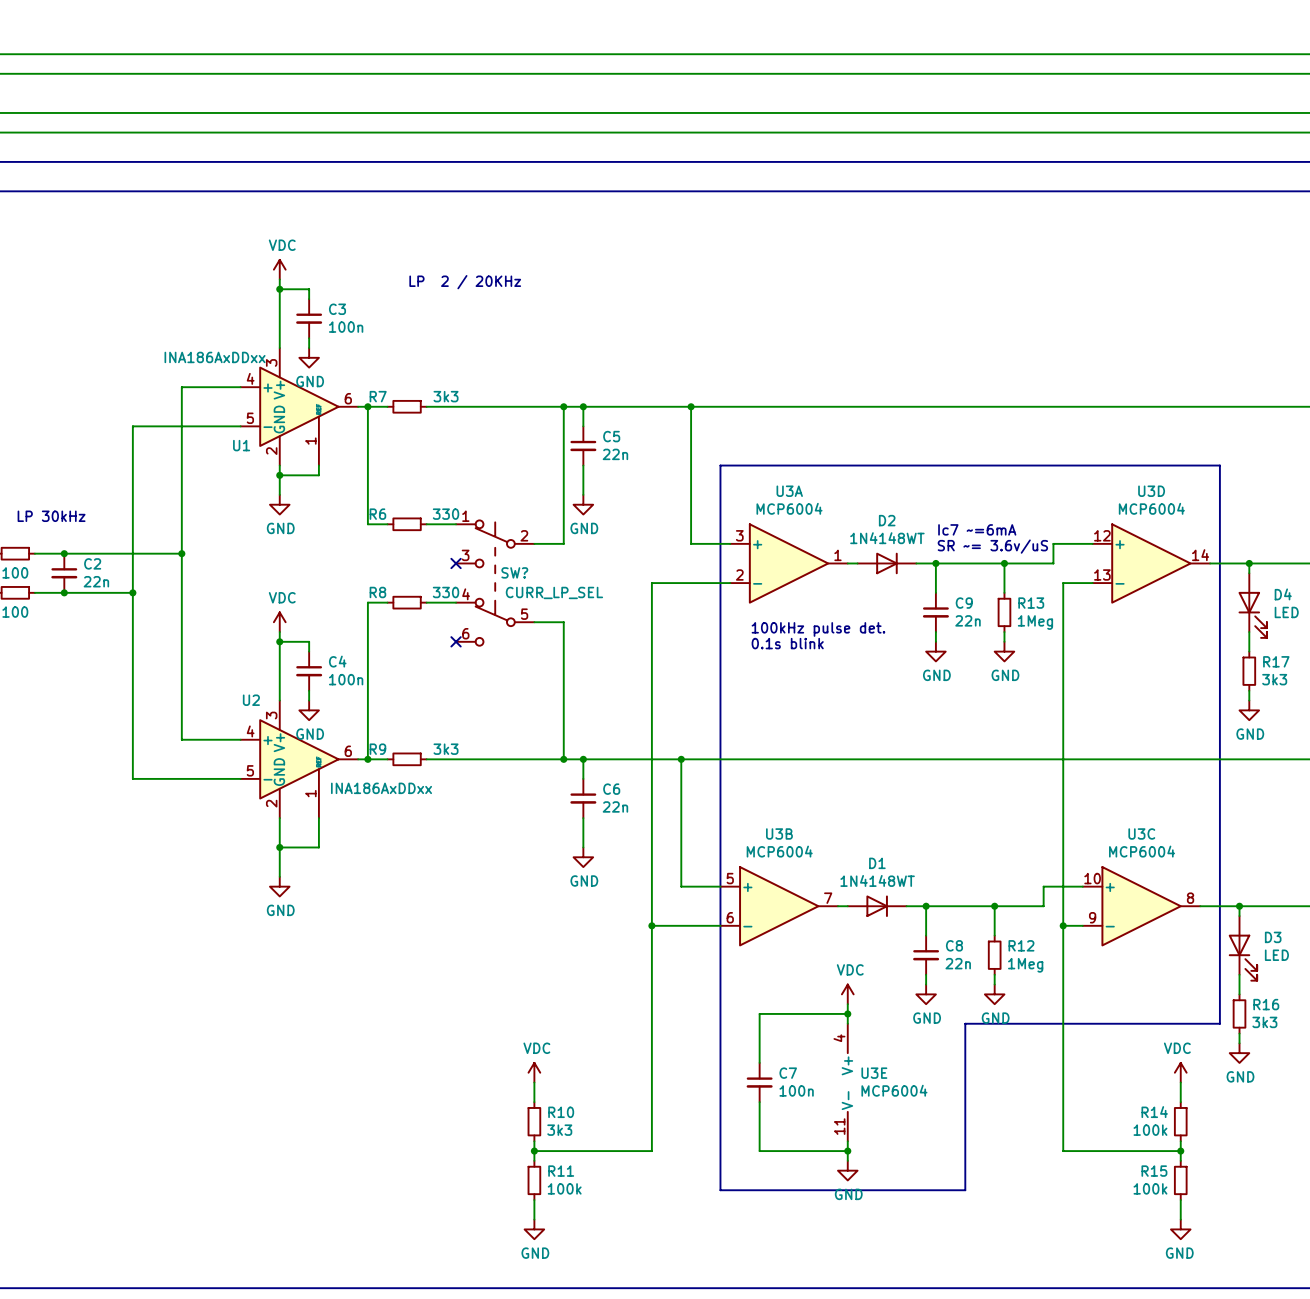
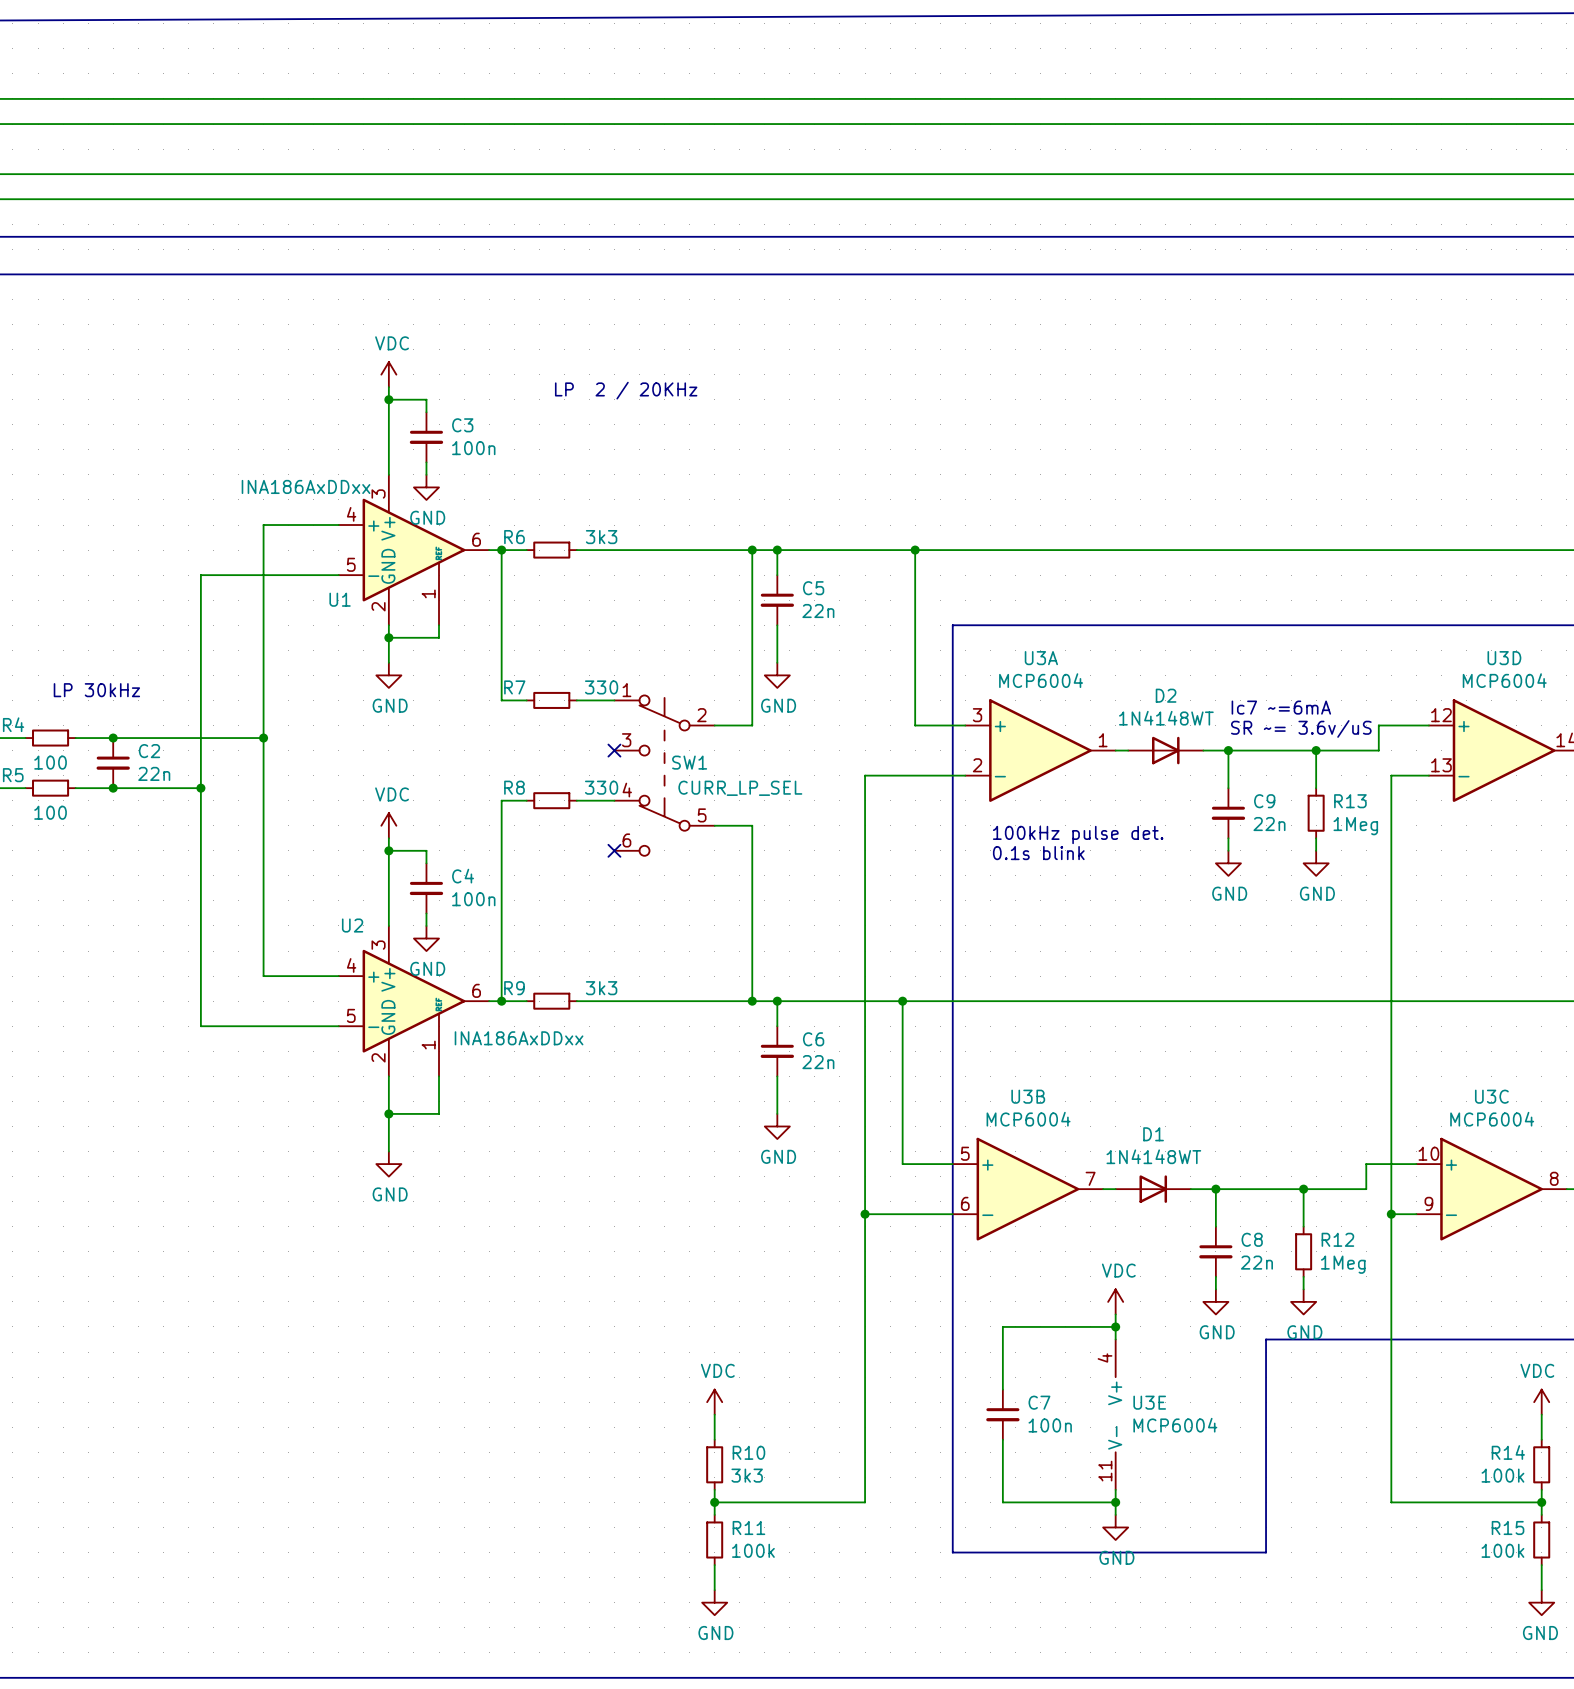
R7 name: R7 (378, 396) -> R6 (514, 537)
R6 name: R6 (377, 514) -> R7 (514, 687)
SW? name: SW? (514, 572) -> SW1 (689, 762)

